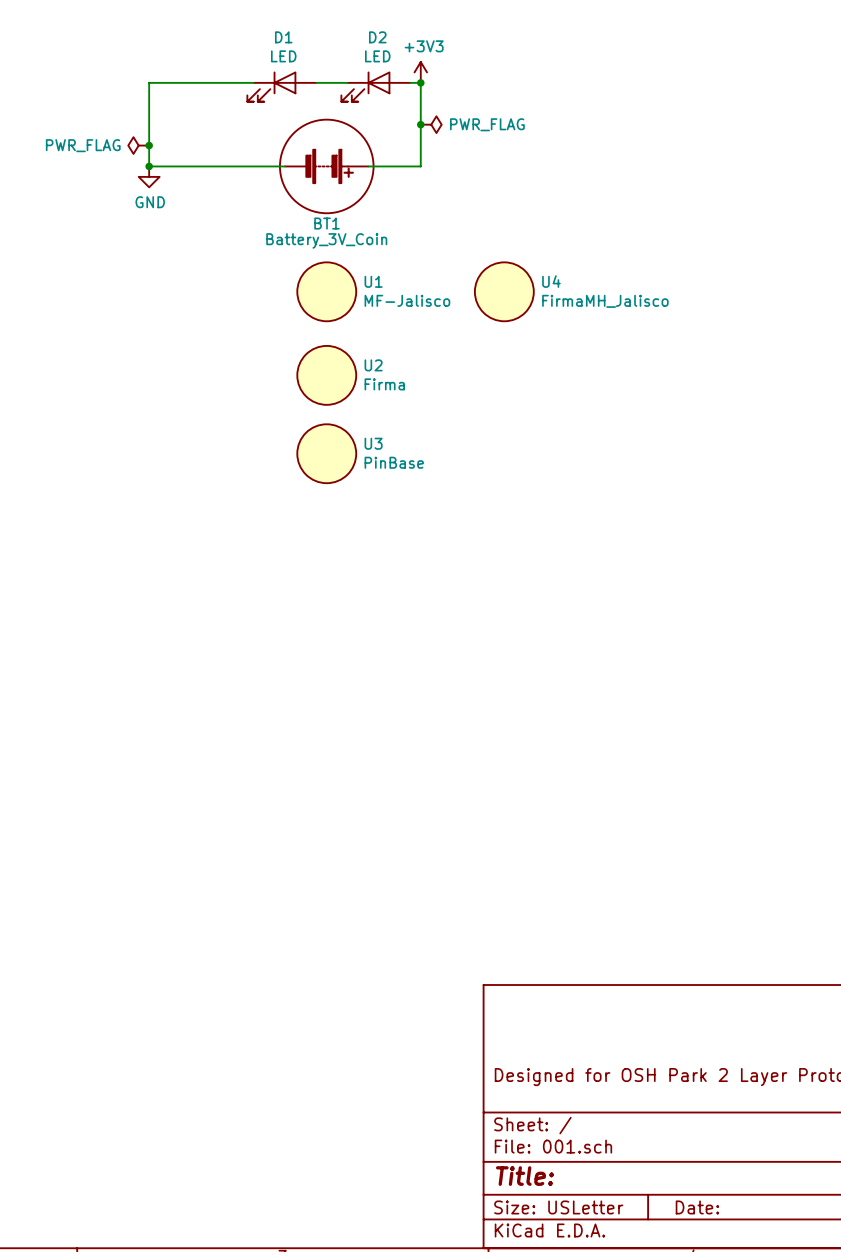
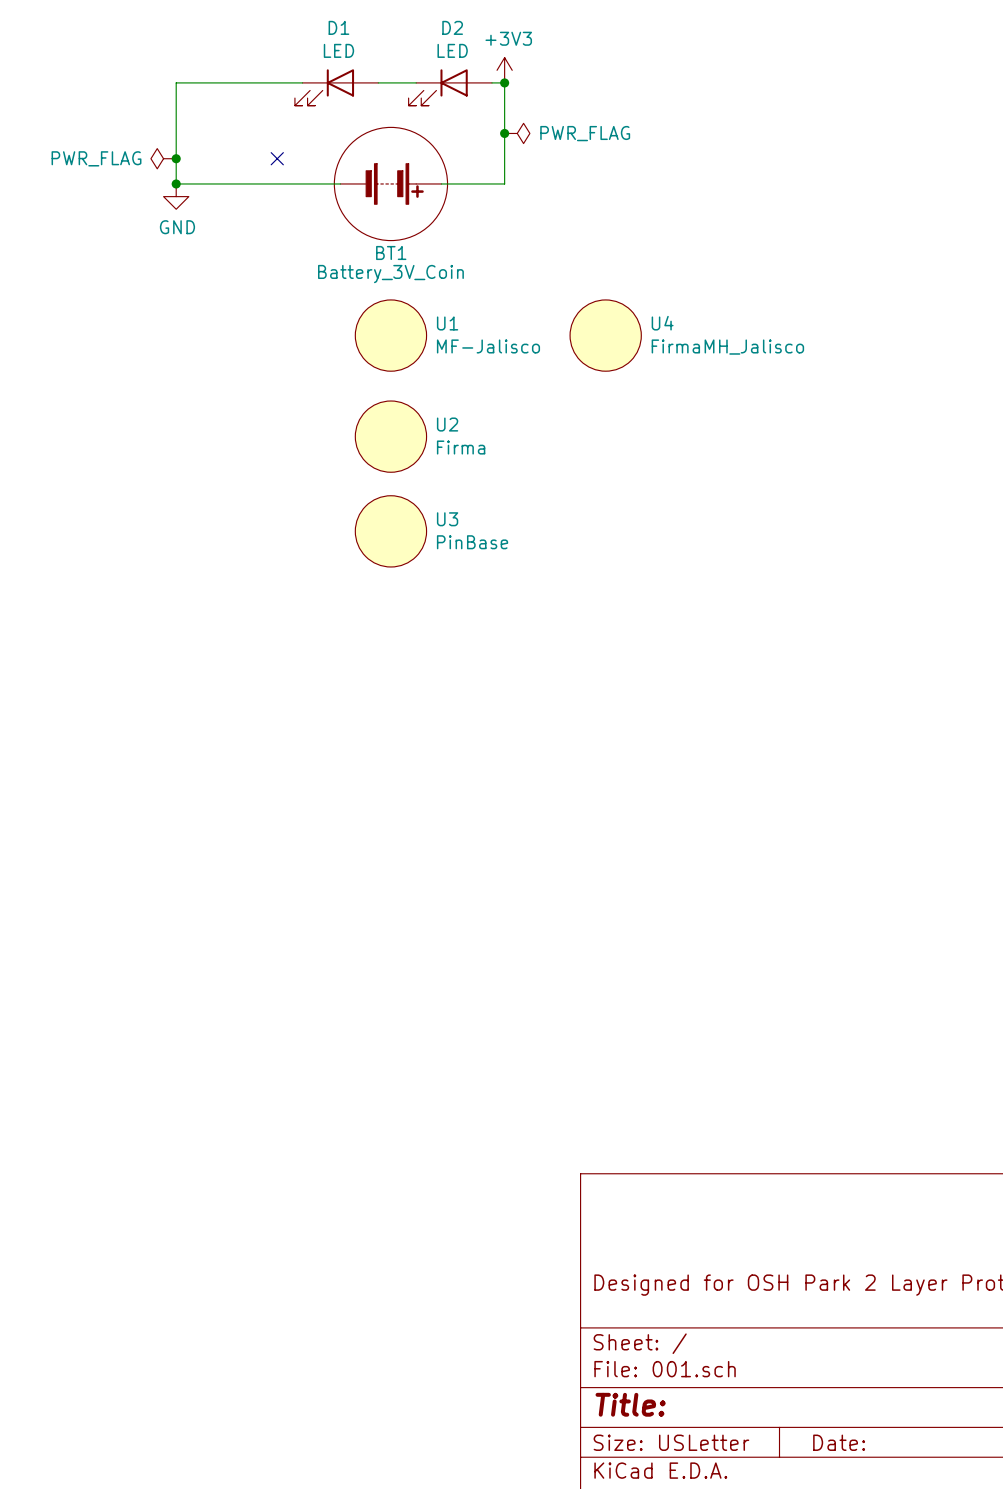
no-connect mark: none -> (277, 158)

